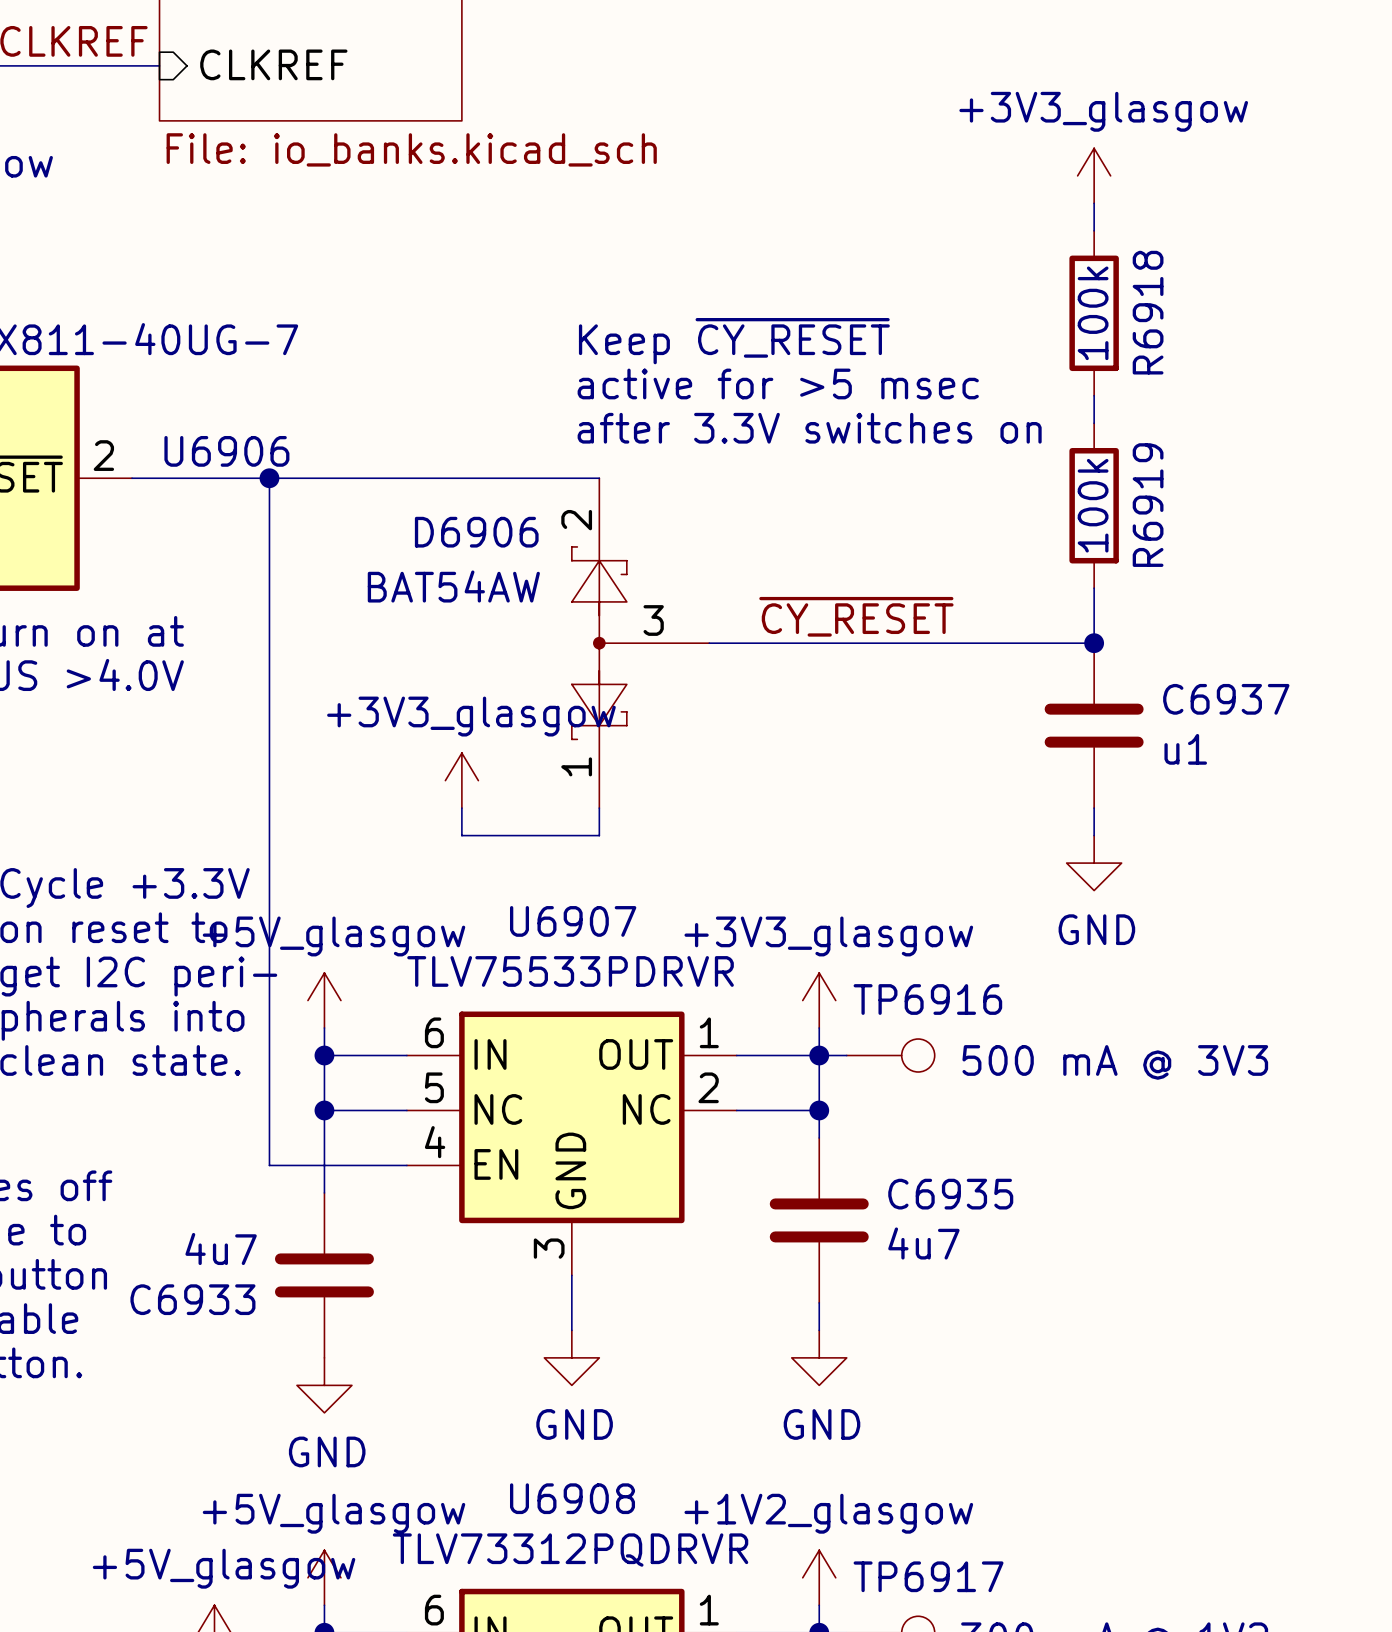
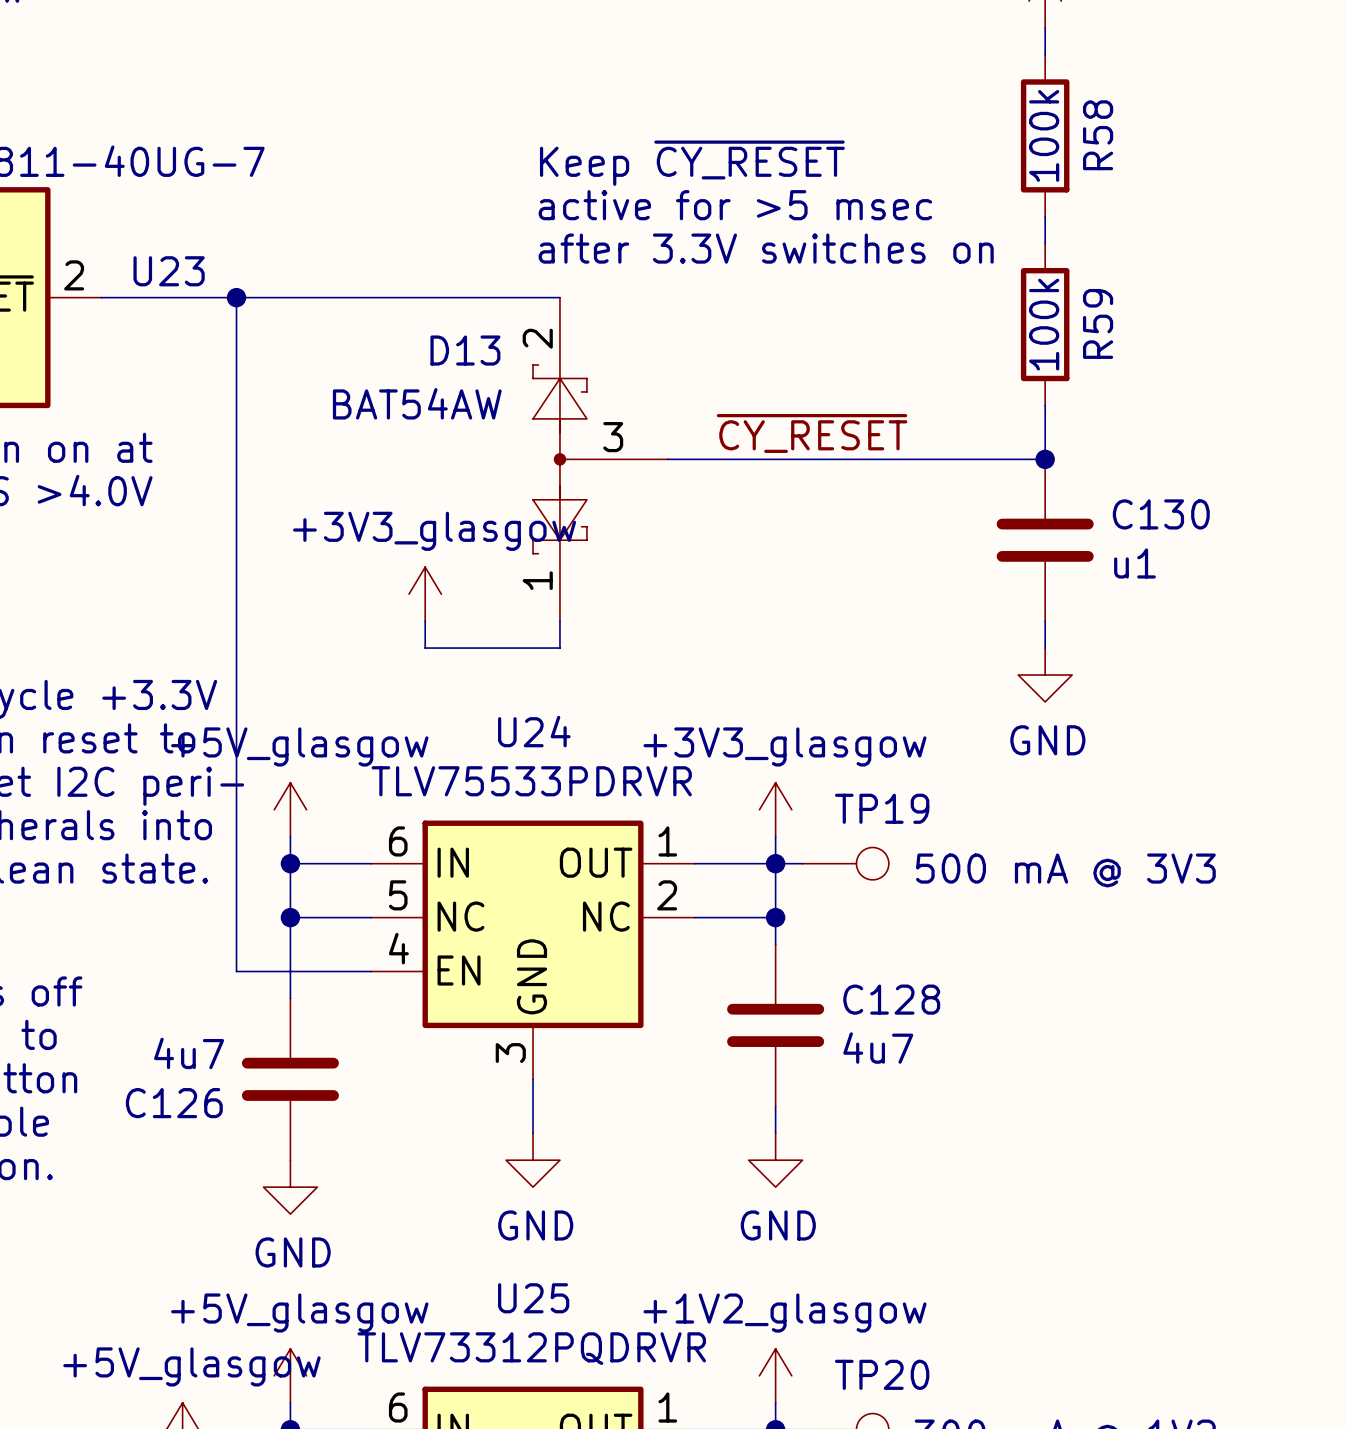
R6918 name: R6918 (1148, 312) -> R58 (1098, 135)
U6906 name: U6906 (226, 451) -> U23 (169, 271)
R6919 name: R6919 (1148, 505) -> R59 (1098, 323)
D6906 name: D6906 (476, 532) -> D13 (465, 350)
C6937 name: C6937 (1226, 699) -> C130 (1161, 514)
U6907 name: U6907 (573, 921) -> U24 (534, 731)
TP6916 name: TP6916 (927, 999) -> TP19 (882, 808)
C6935 name: C6935 (950, 1194) -> C128 (891, 999)
C6933 name: C6933 (192, 1299) -> C126 (174, 1103)
U6908 name: U6908 (572, 1498) -> U25 (533, 1298)
TP6917 name: TP6917 (928, 1576) -> TP20 (882, 1374)

